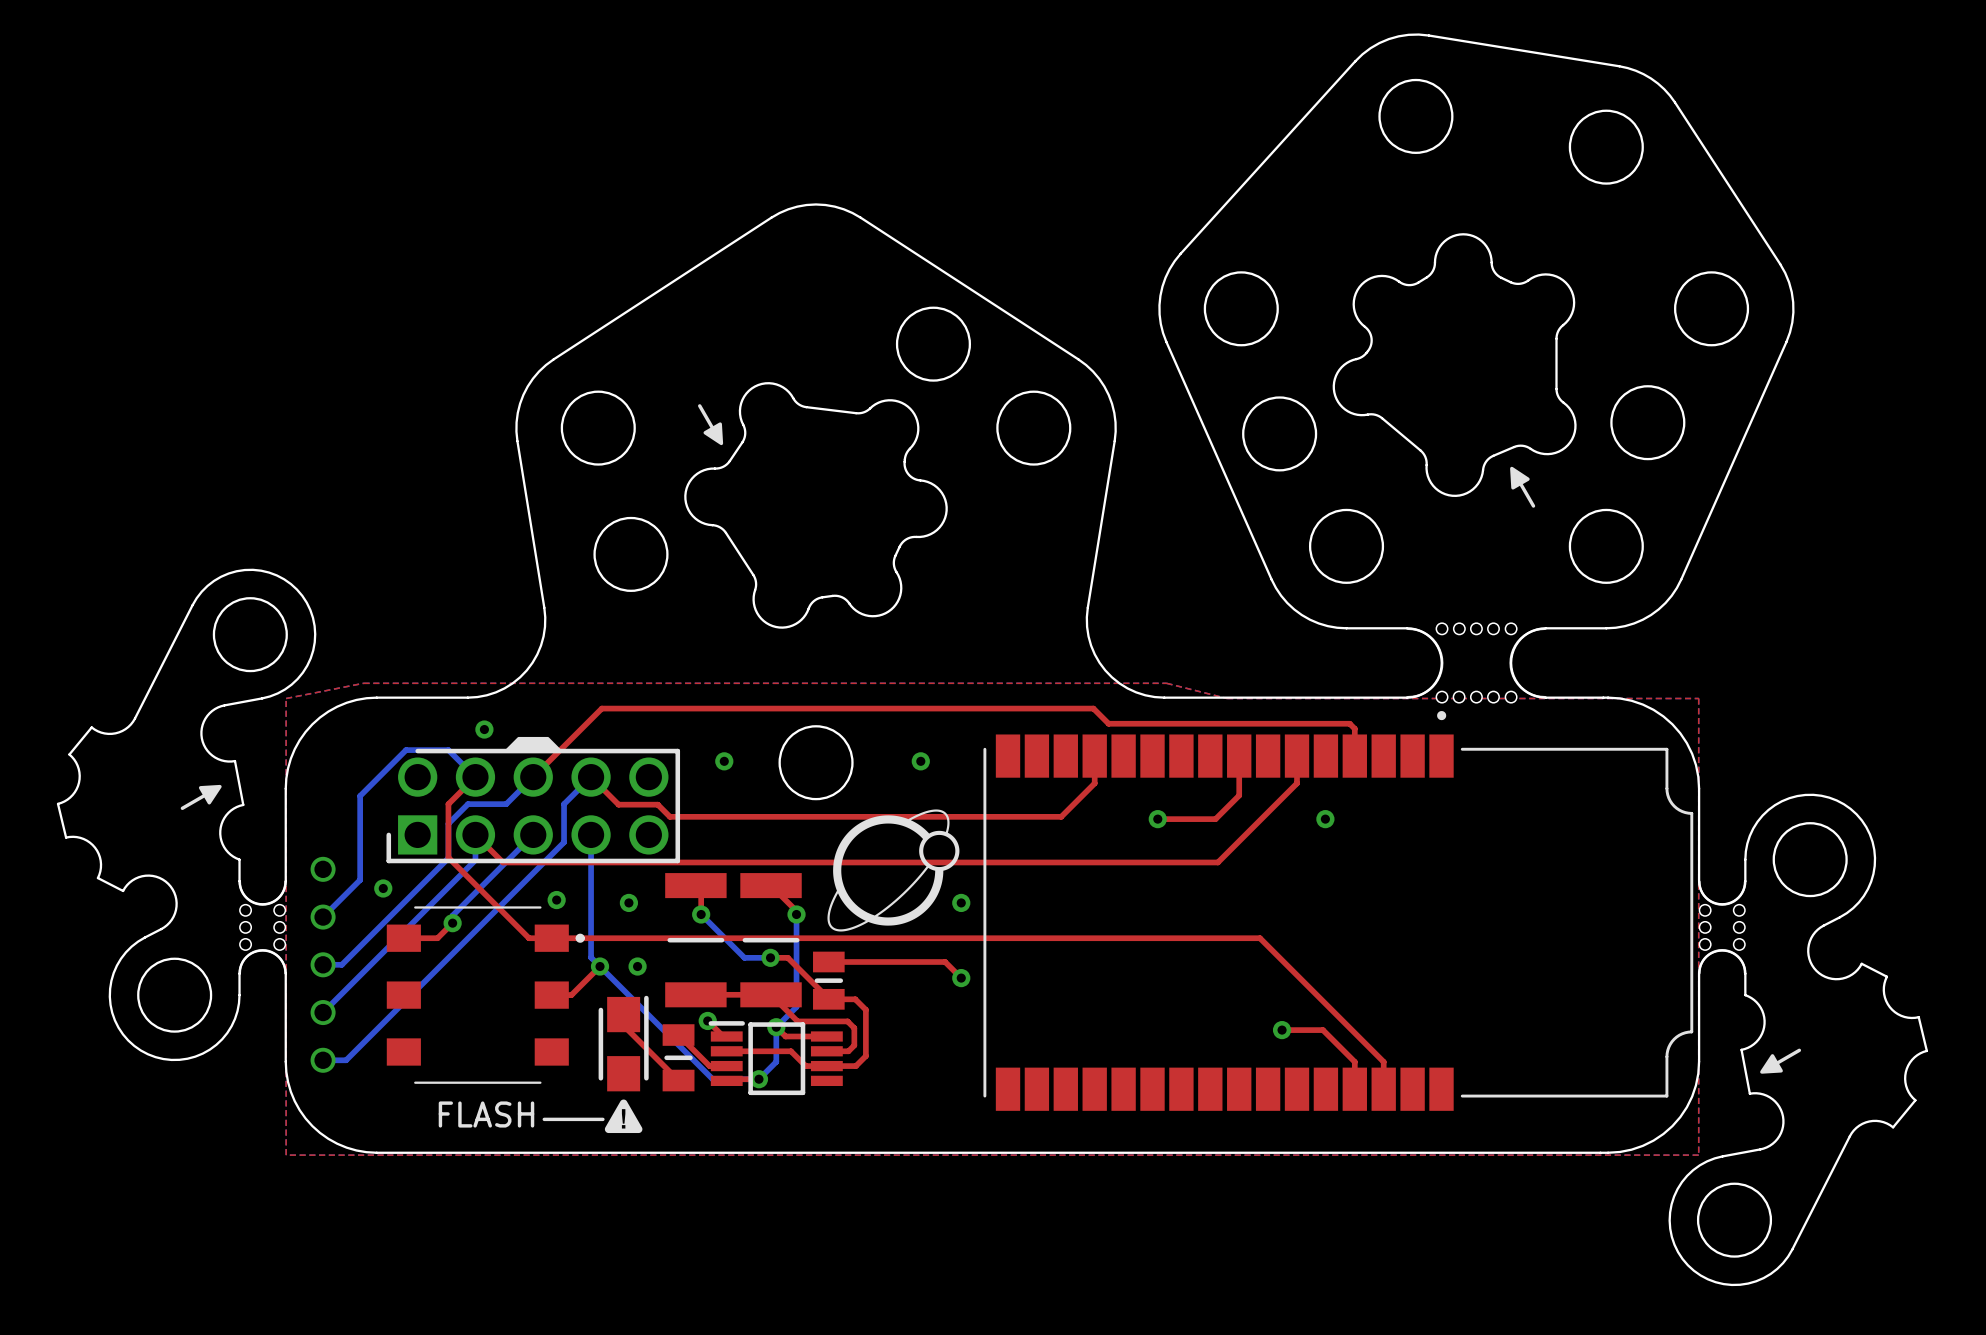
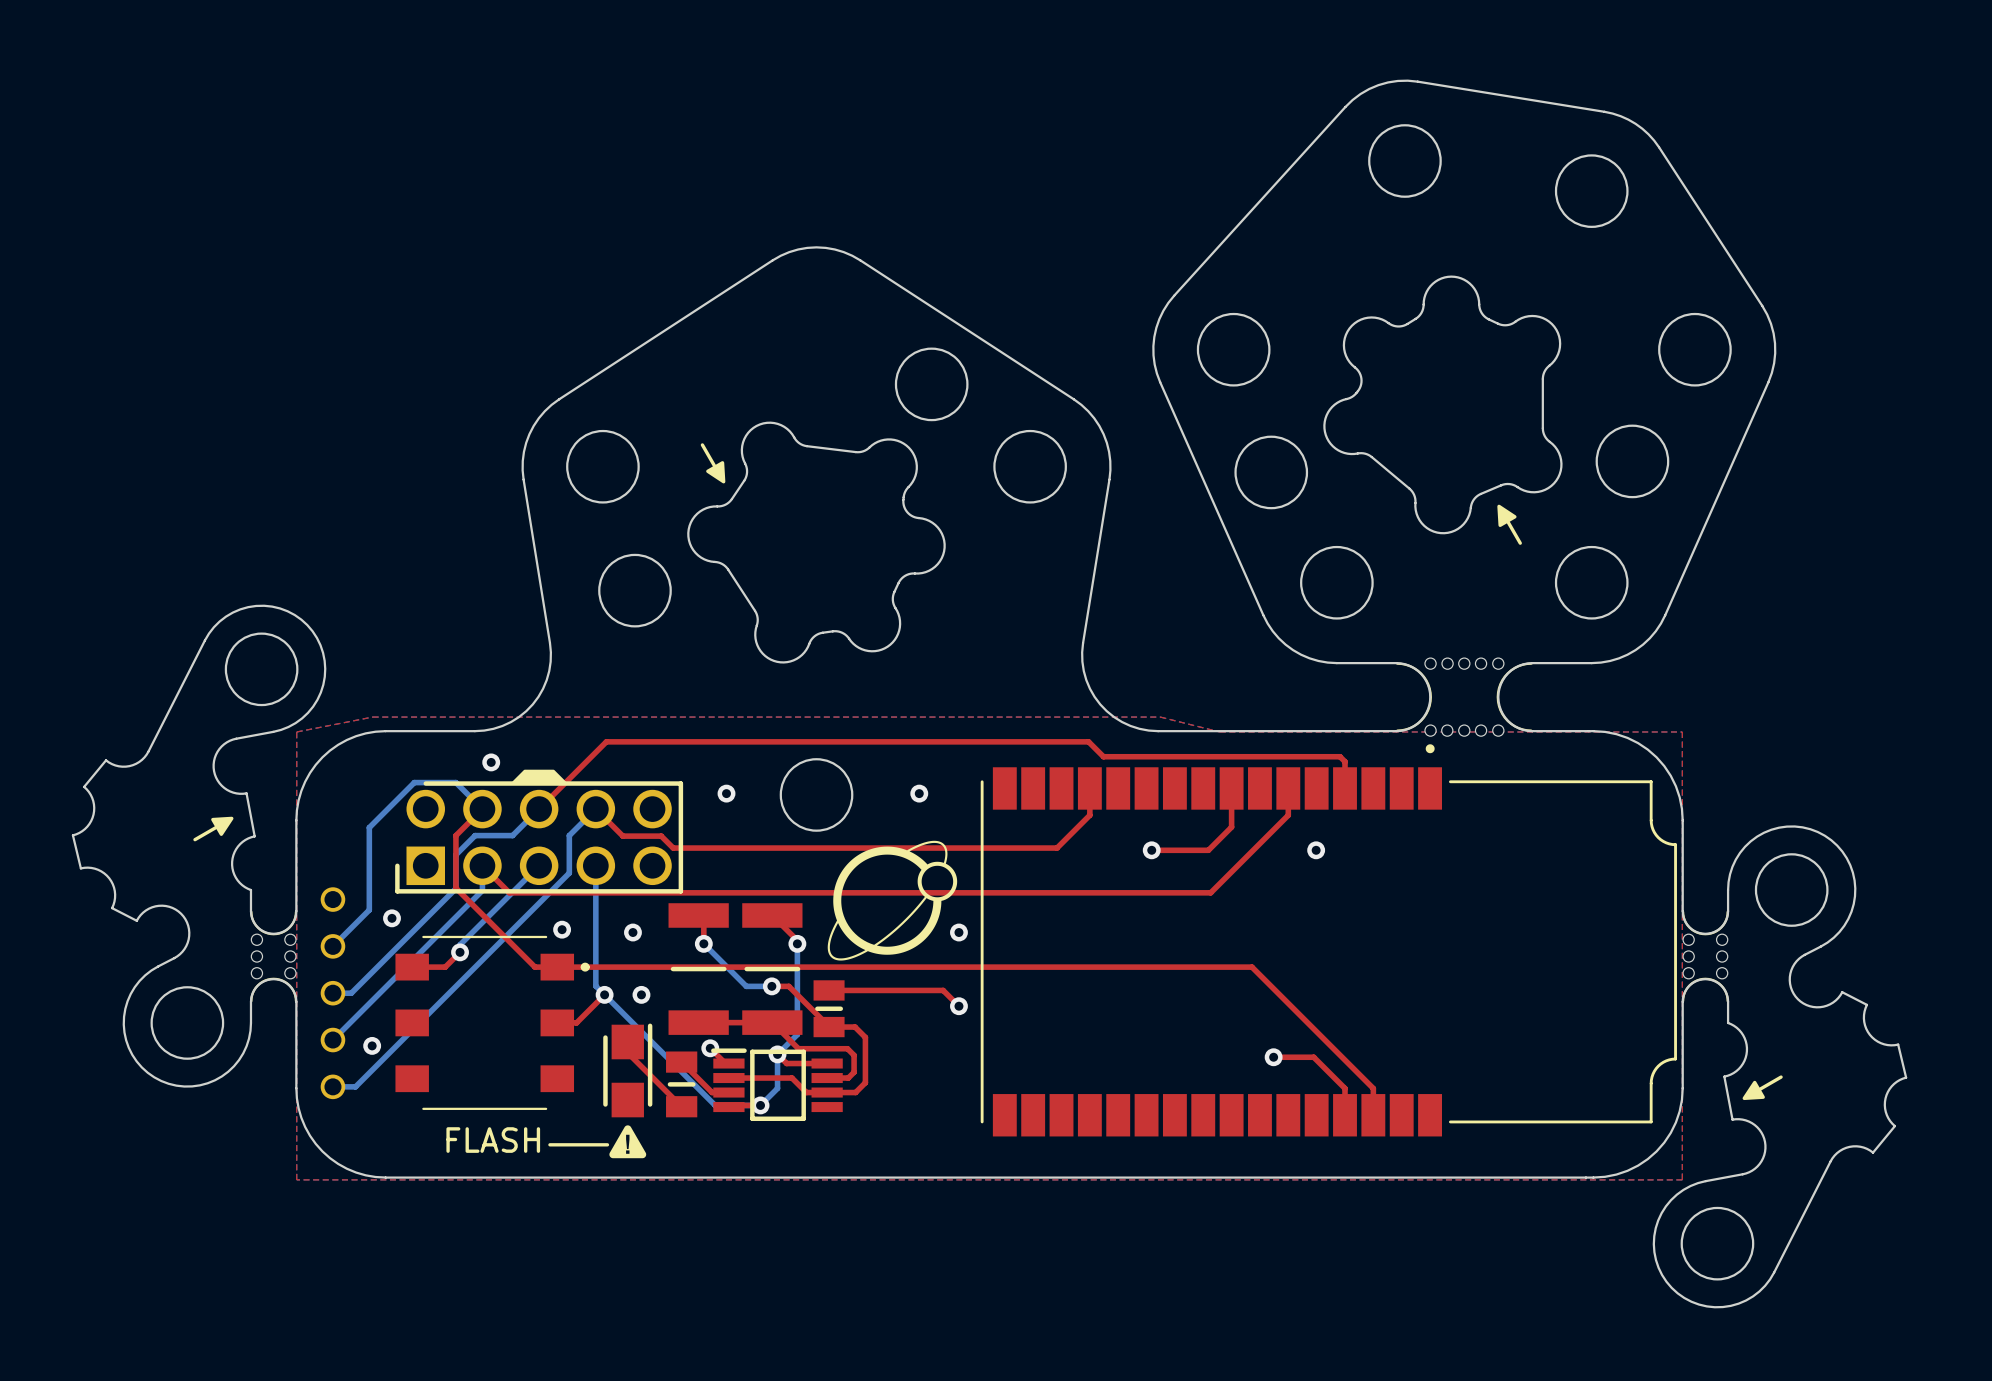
via: none -> (372, 1045)

